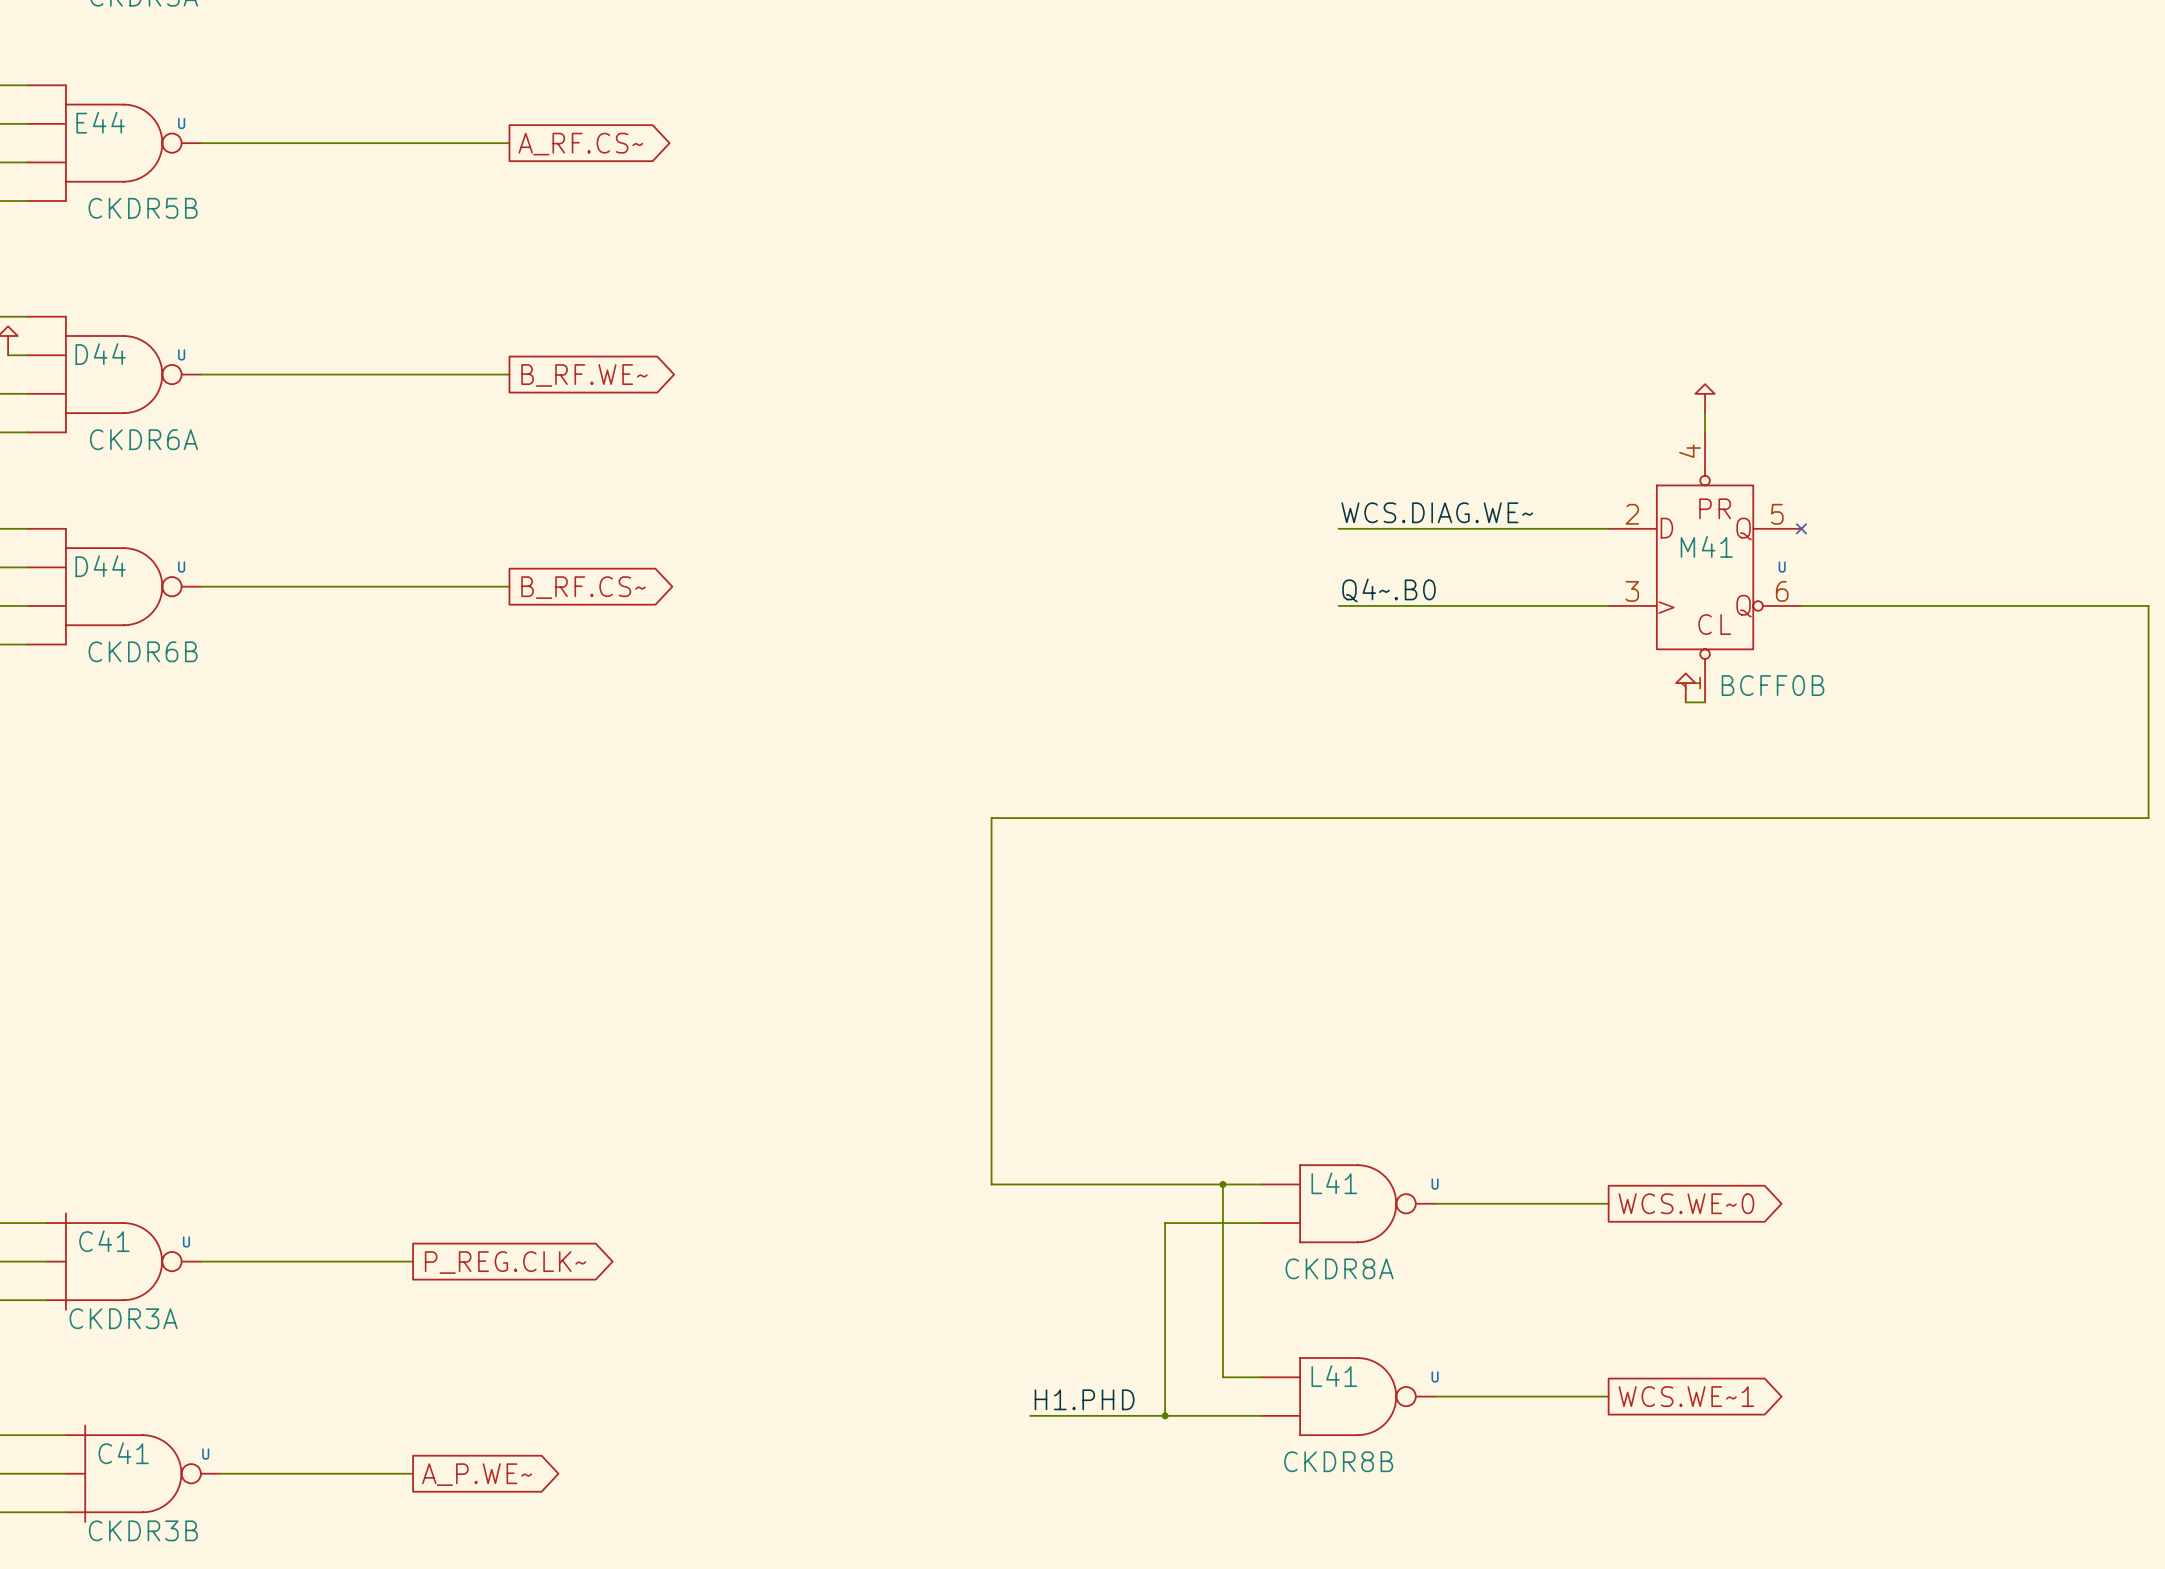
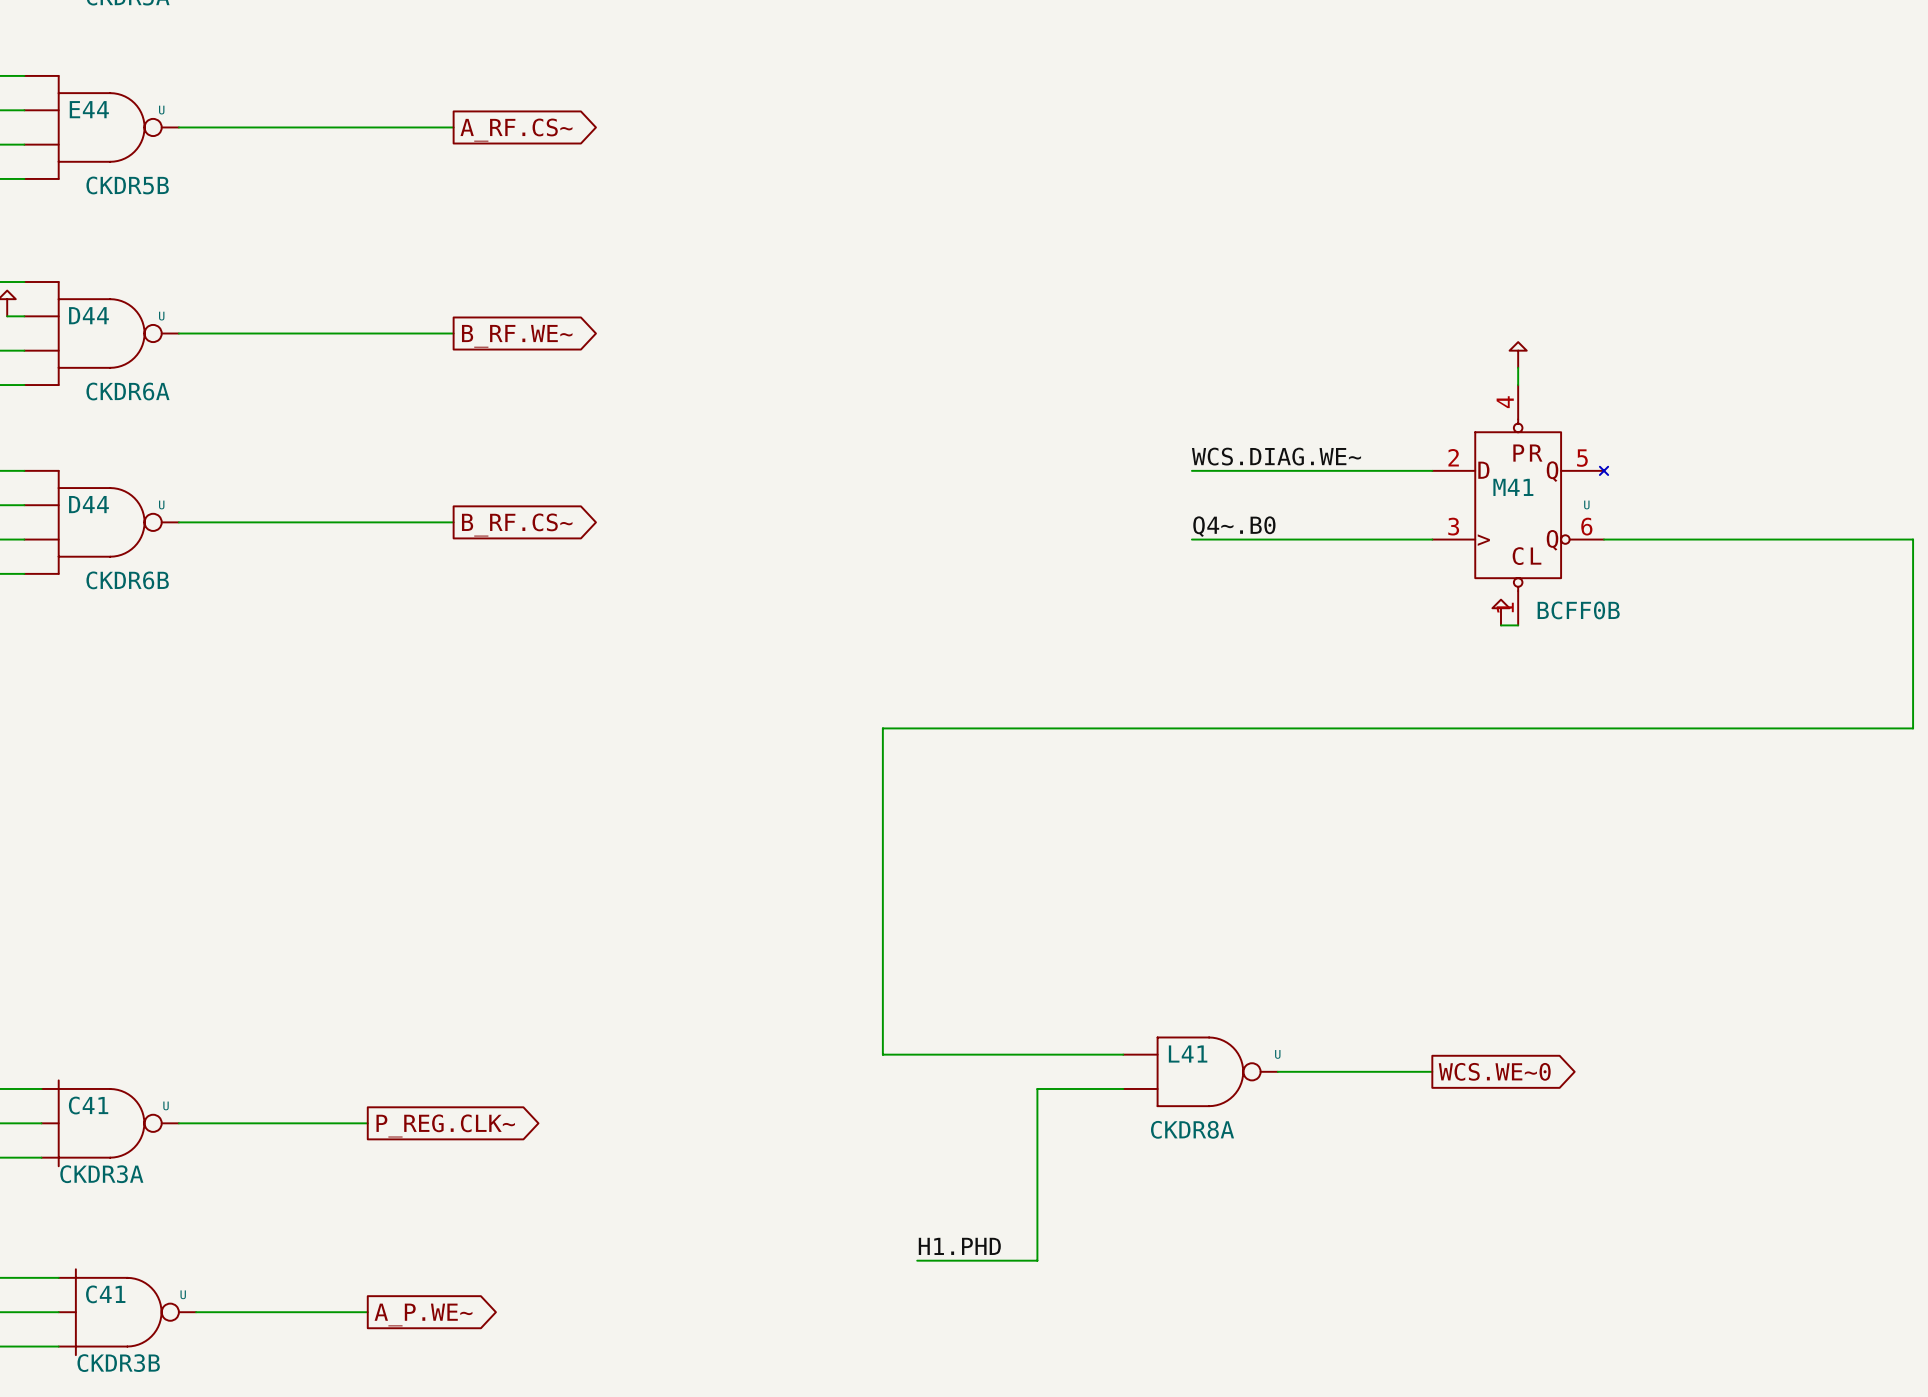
wire: (1222, 1184) (1222, 1377) (1261, 1377) -> none
junction: (1222, 1184) -> none
U: (1348, 1396) -> none
wire: (1435, 1396) (1608, 1396) -> none
global label: WCS.WE~1 (1686, 1396) -> none
wire: (1165, 1415) (1261, 1415) -> none
junction: (1165, 1415) -> none

